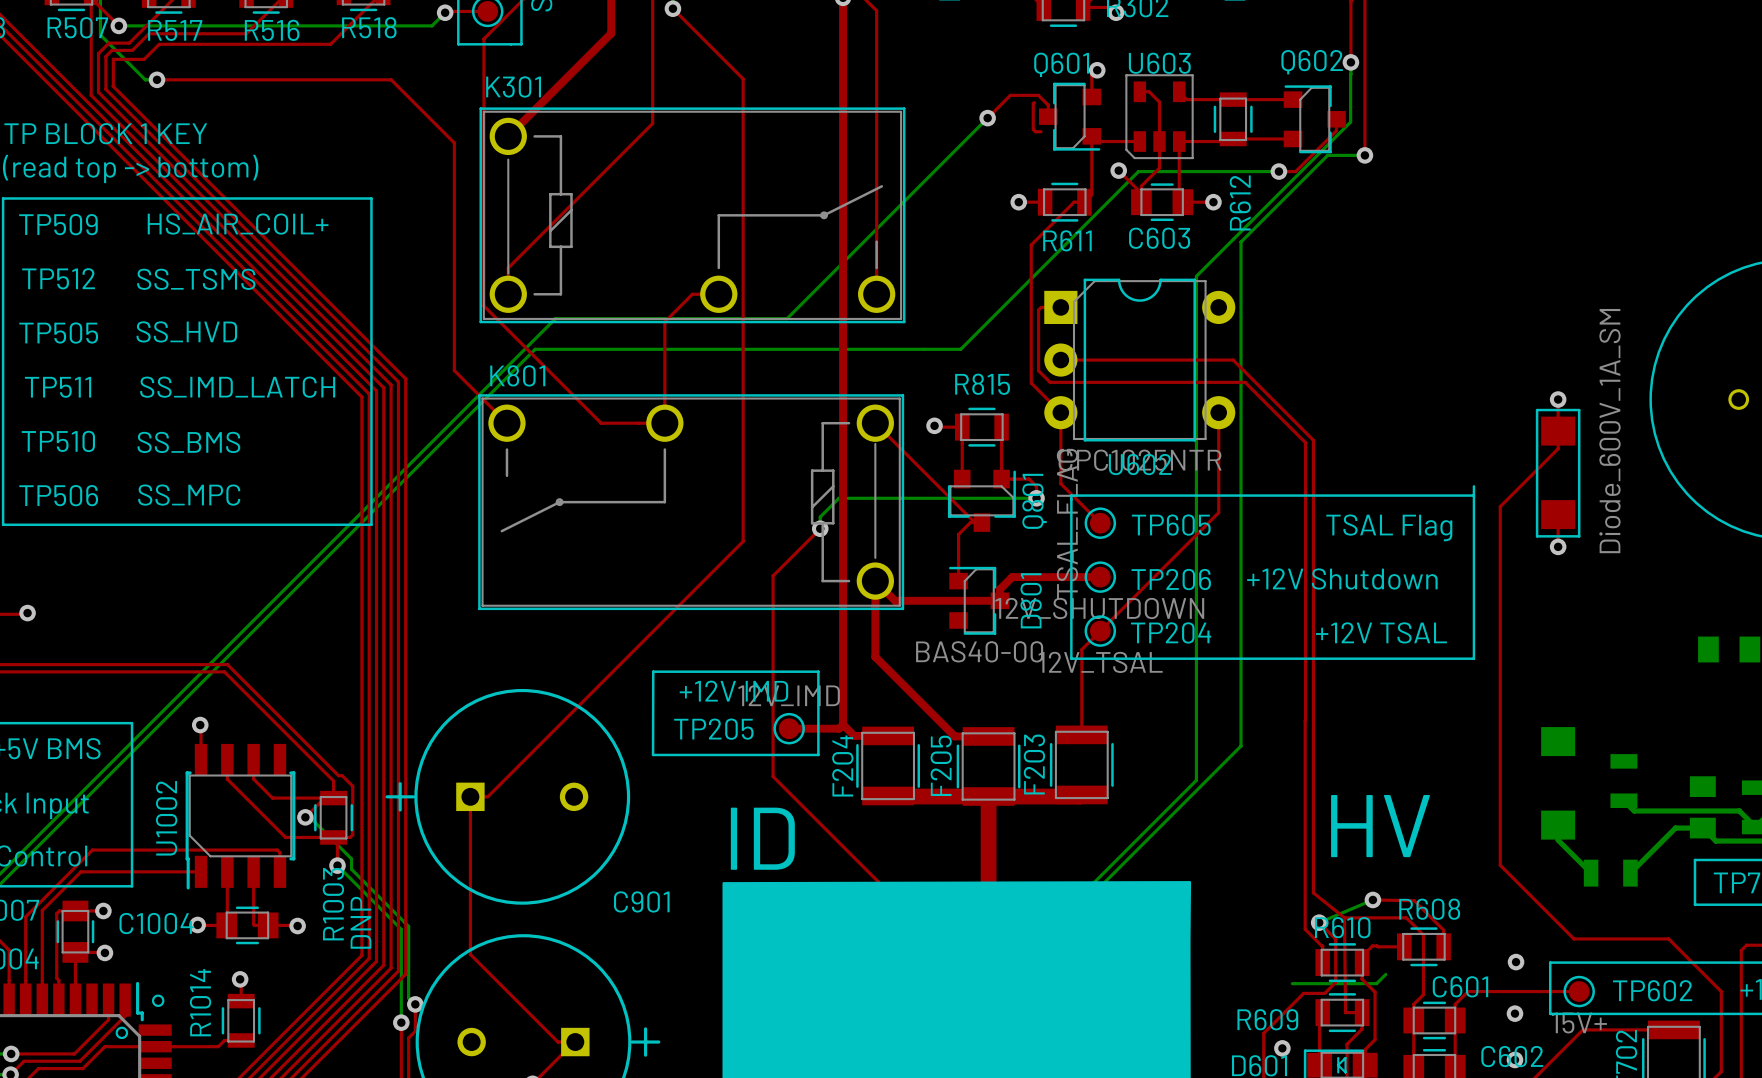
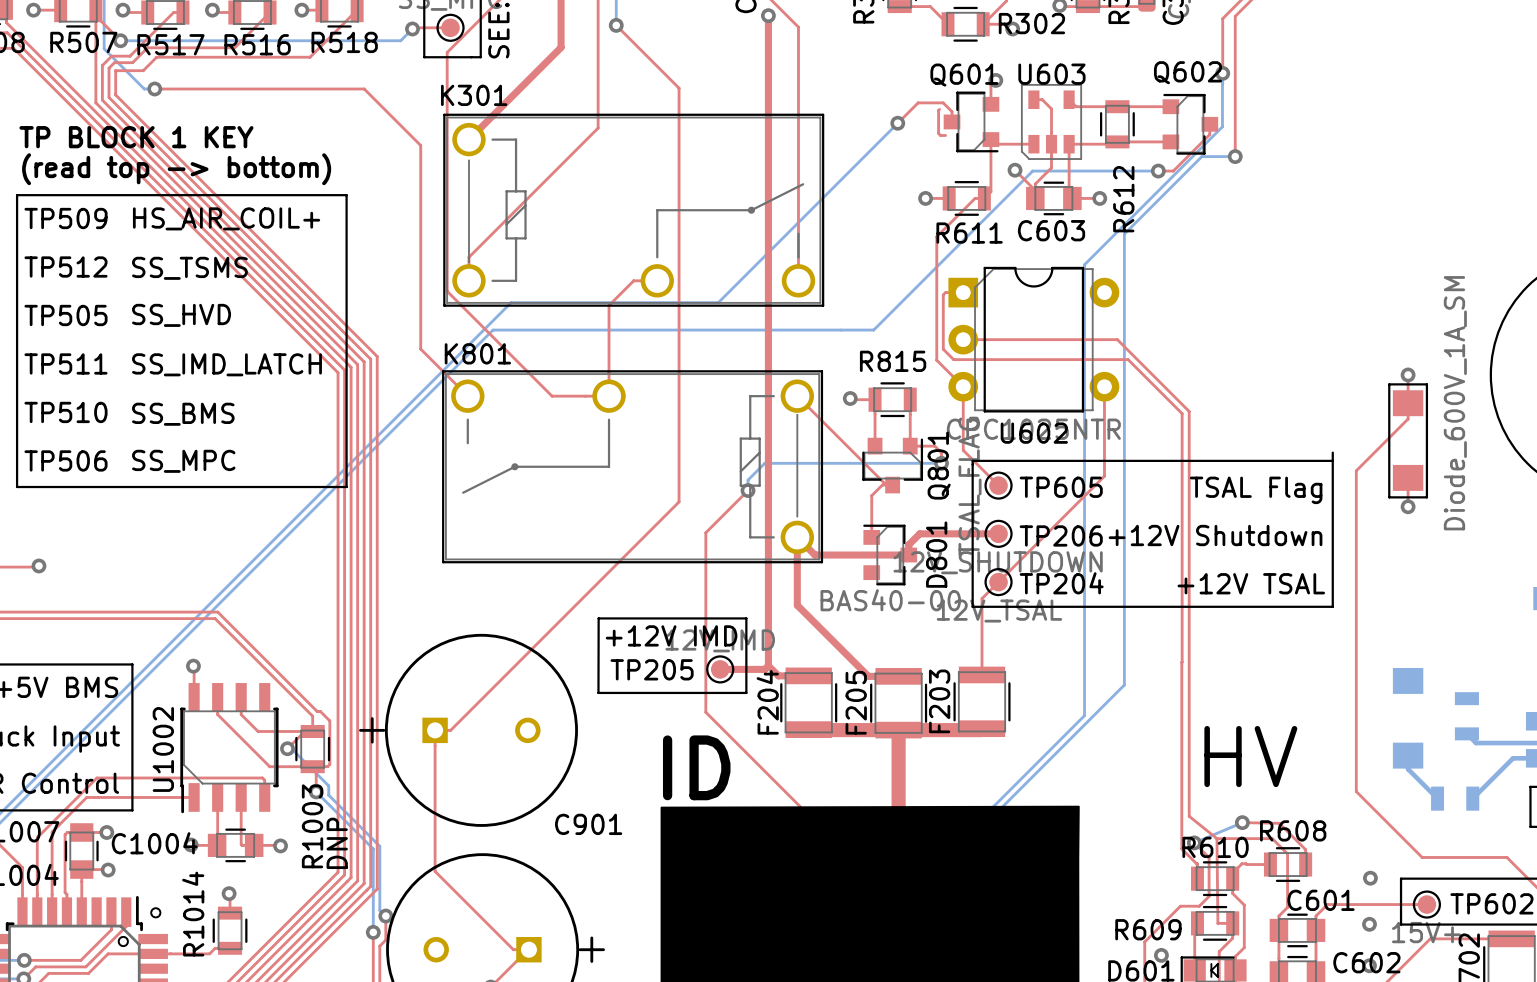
bottom track: (1385, 974) (1376, 983) (1292, 983) -> none

